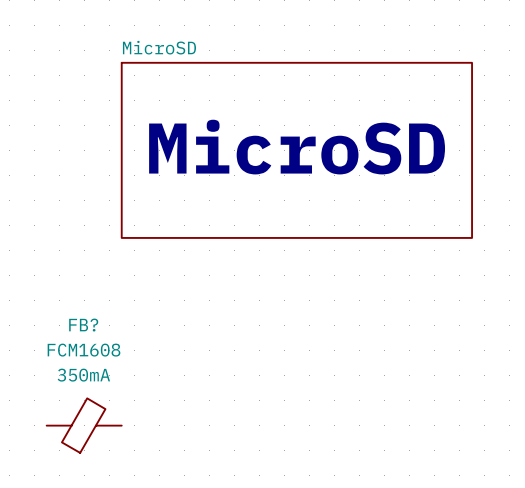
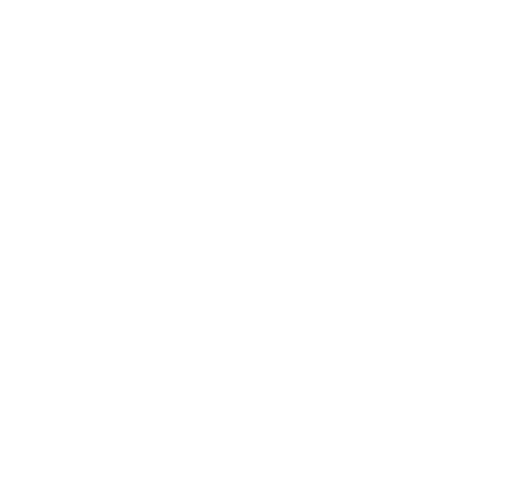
text: MicroSD (297, 147) -> none
sheet MicroSD: (296, 150) -> none
FB?: FCM1608 (84, 425) -> none

